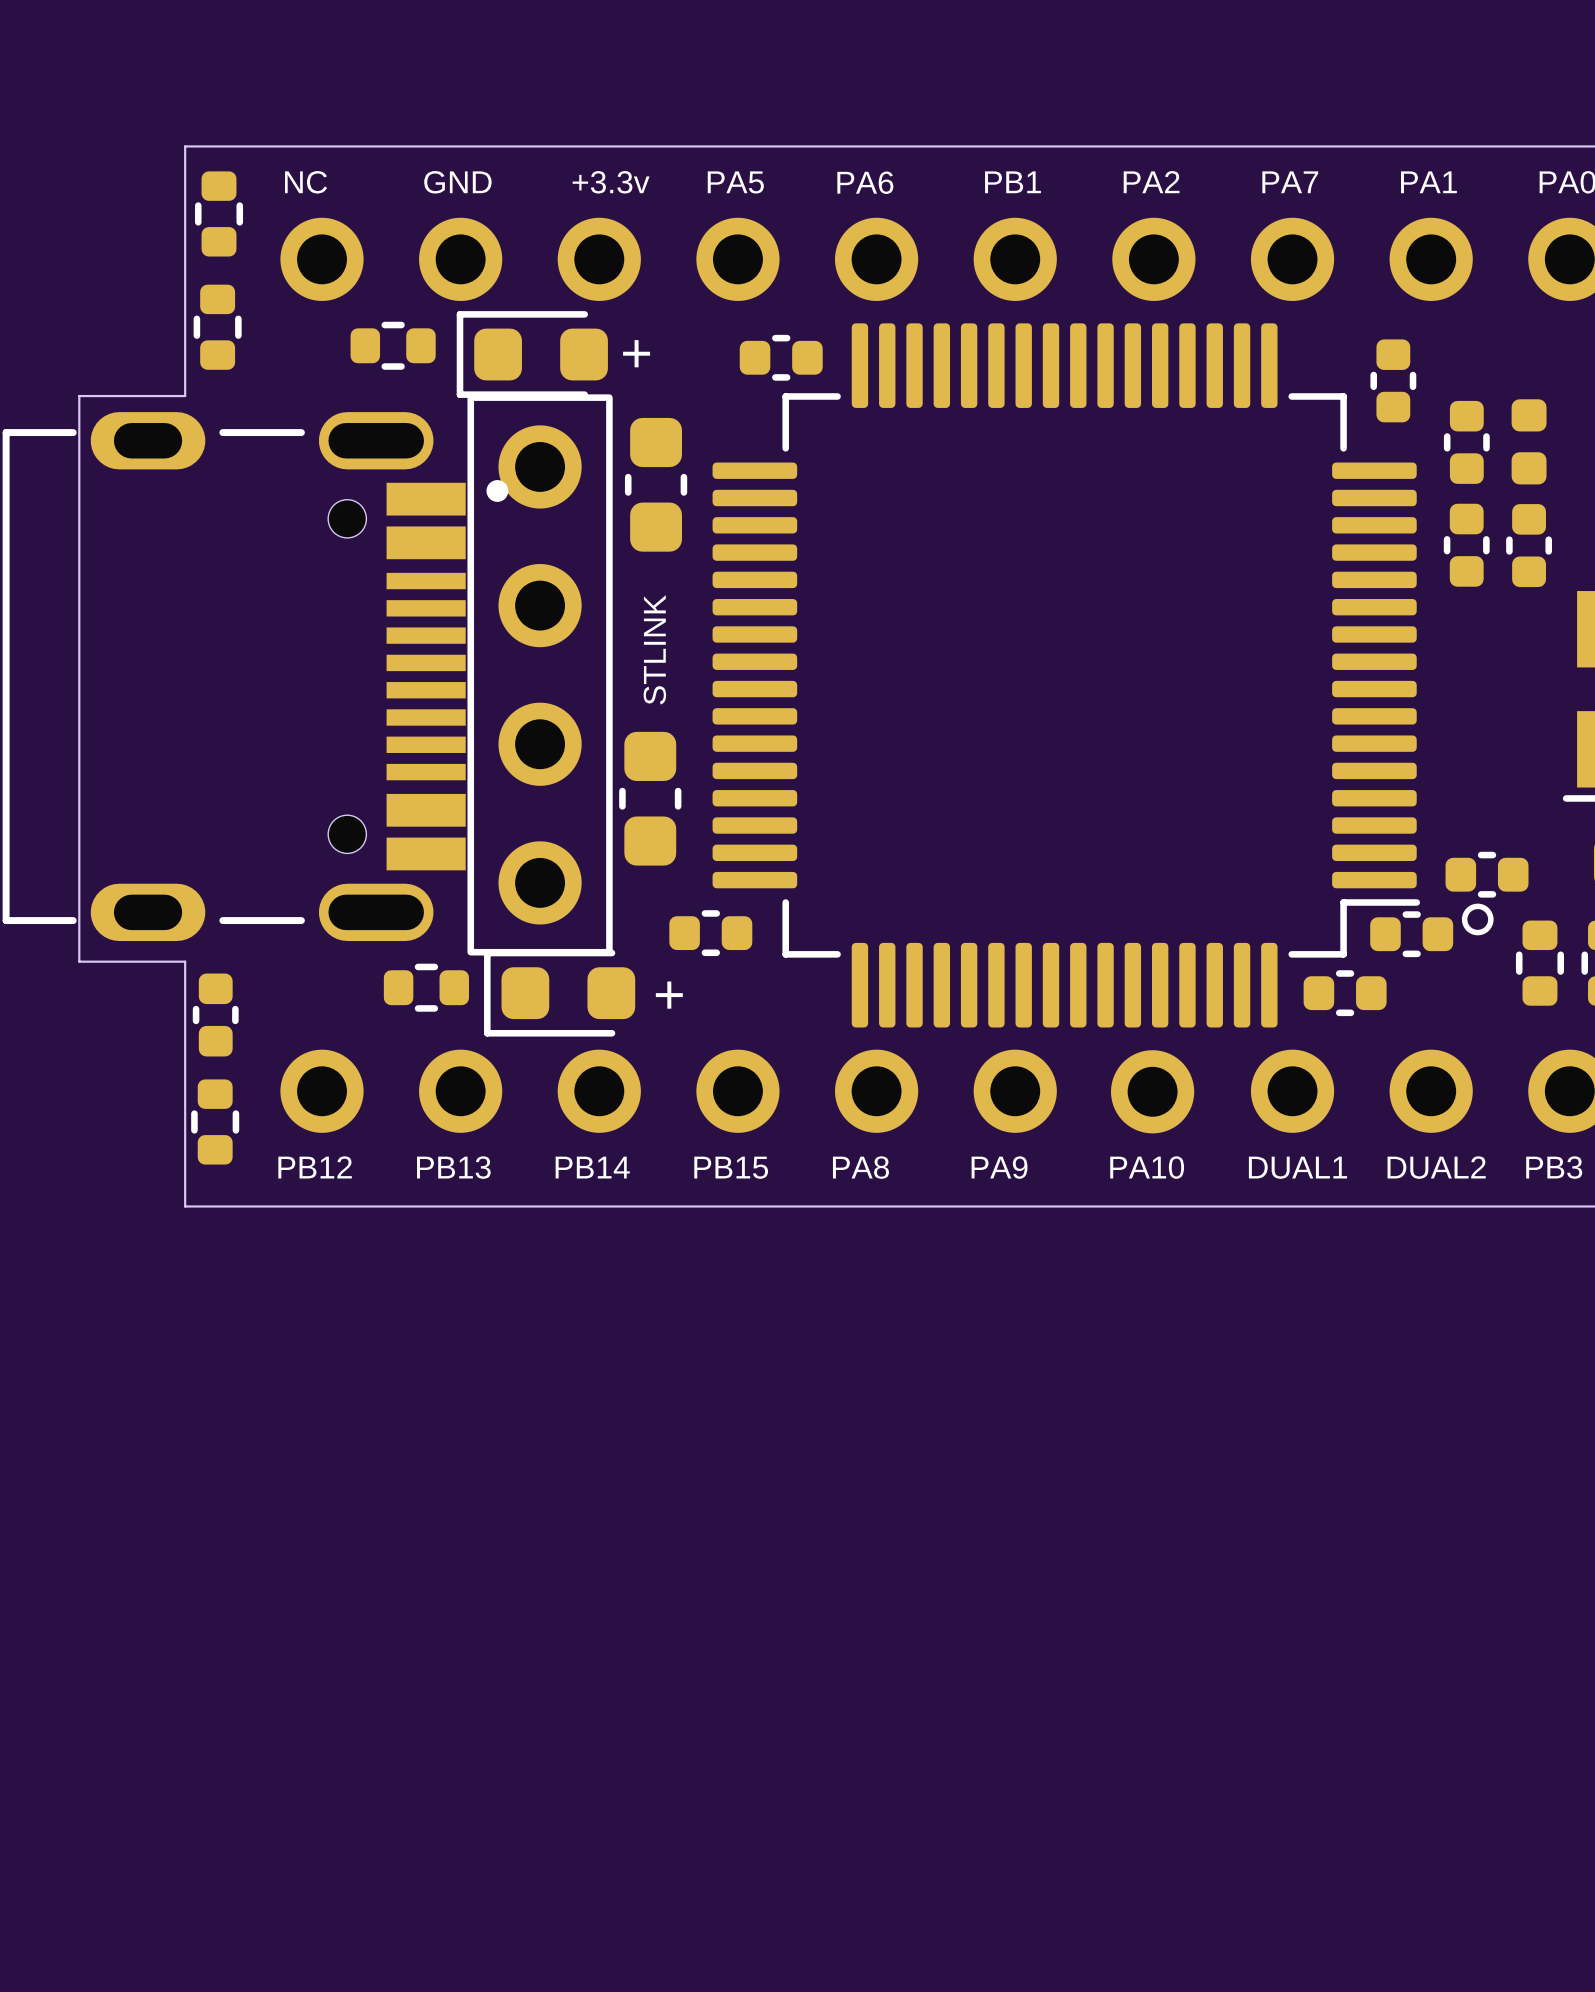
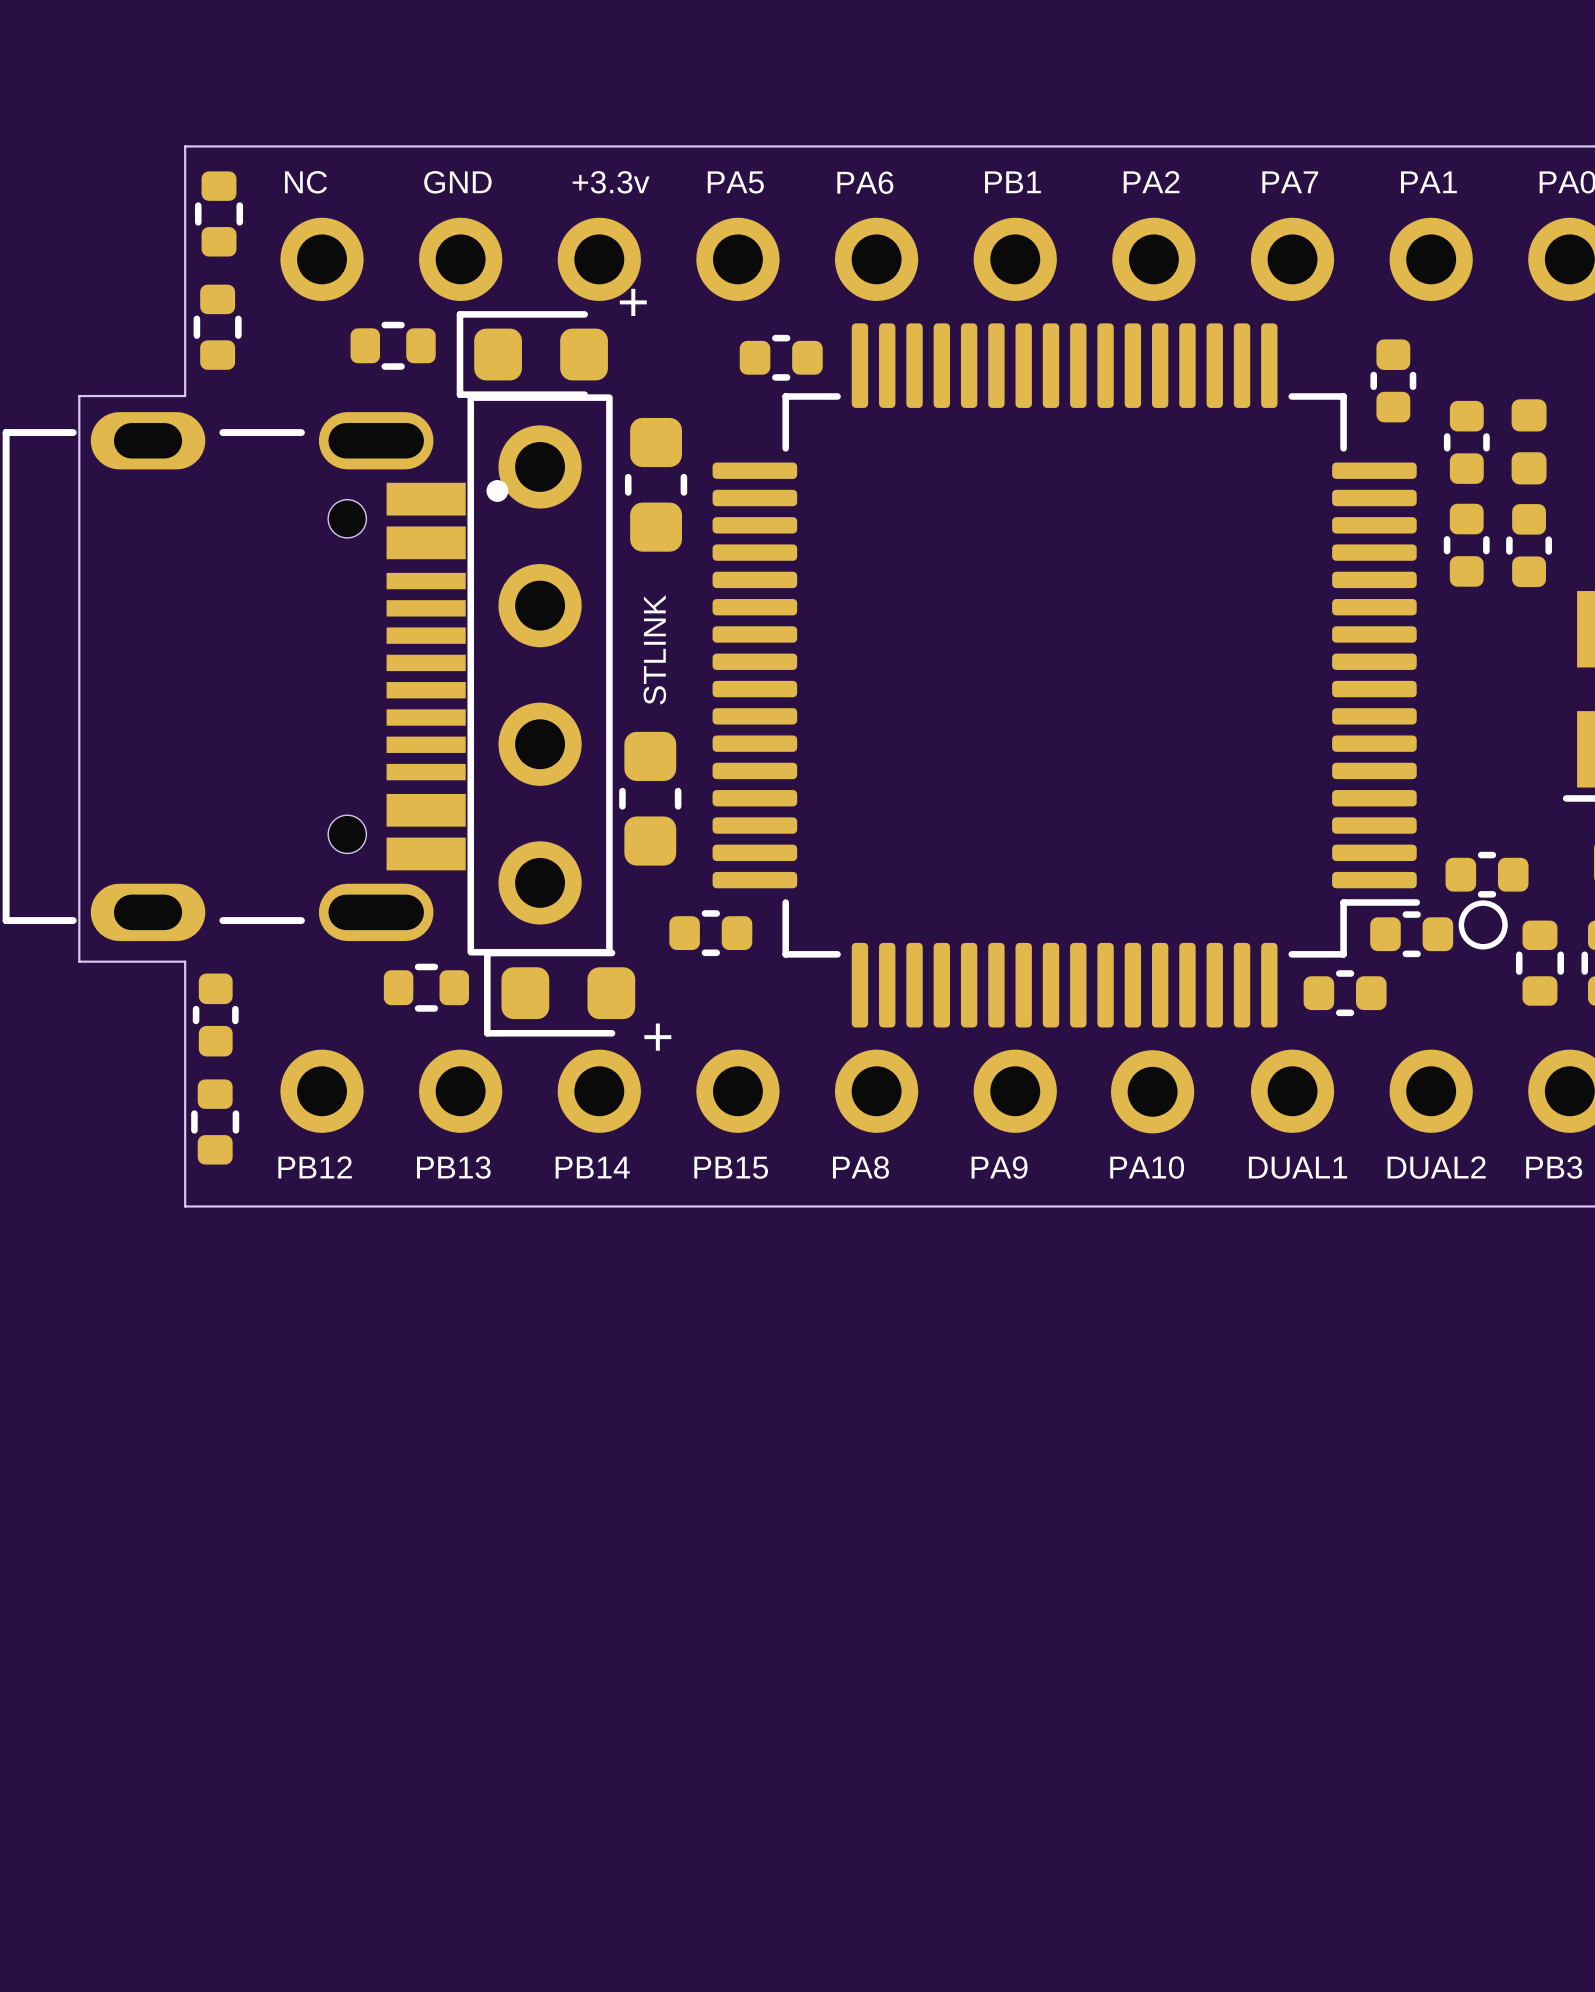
text position: + (636, 353) -> + (633, 302)
drawing shape: [1461, 903, 1494, 936] -> [1458, 900, 1508, 950]
text position: + (669, 995) -> + (657, 1037)

